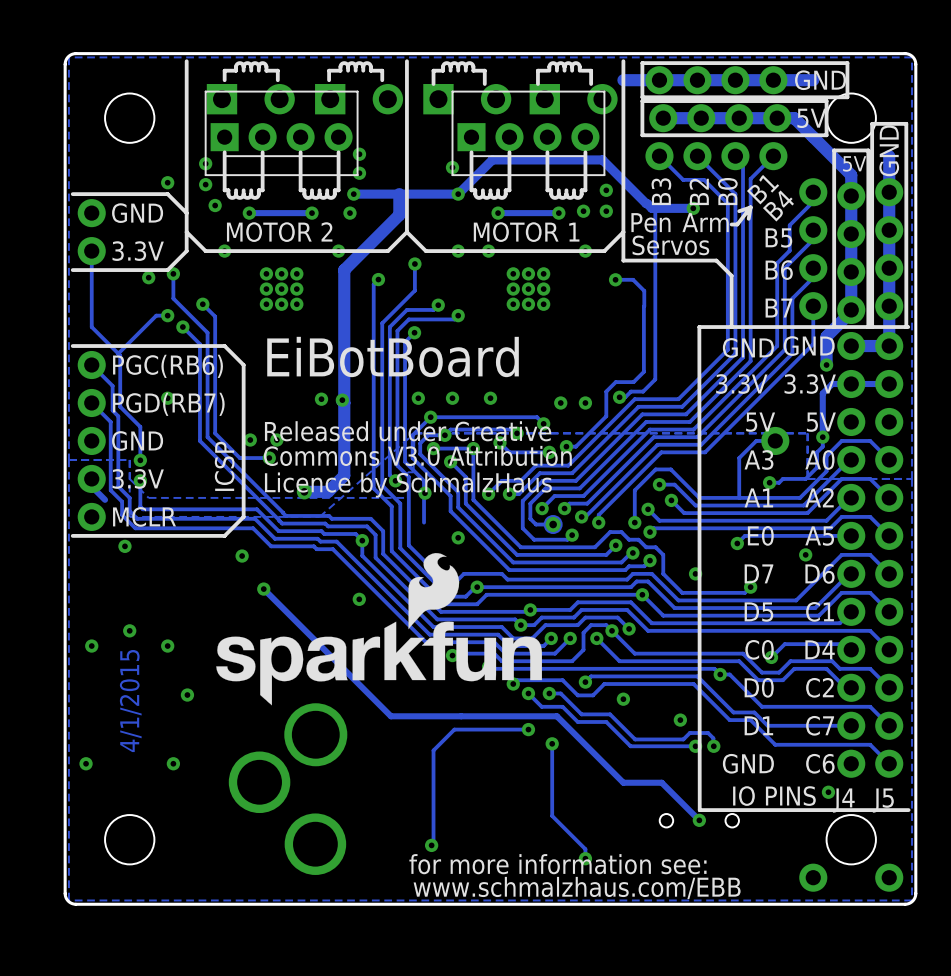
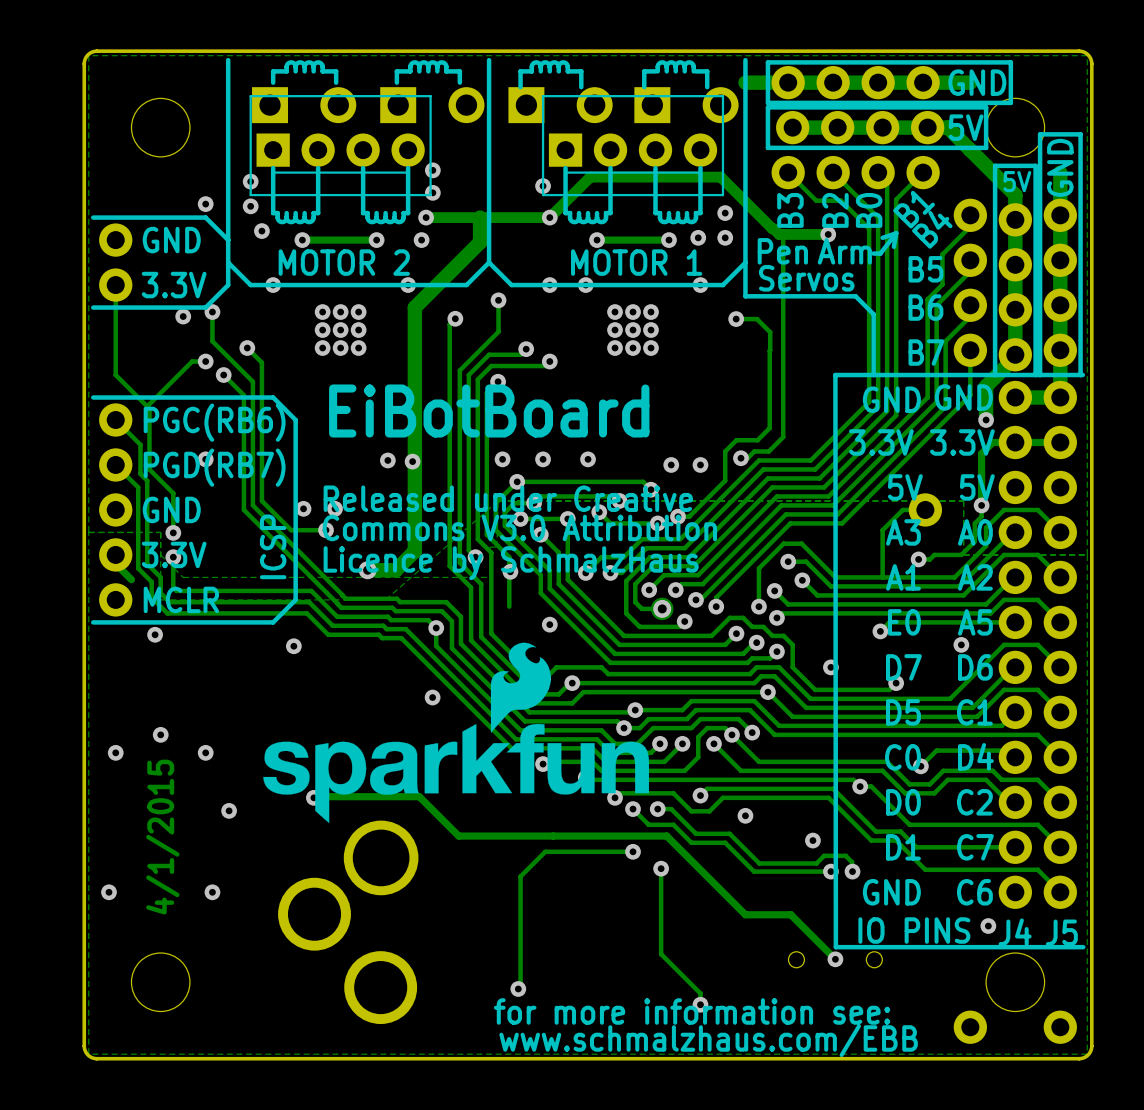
track: (263, 589) (390, 716) -> (313, 797) (419, 796) (458, 836) (470, 836)
via: (263, 589) -> none
via: none -> (313, 797)

